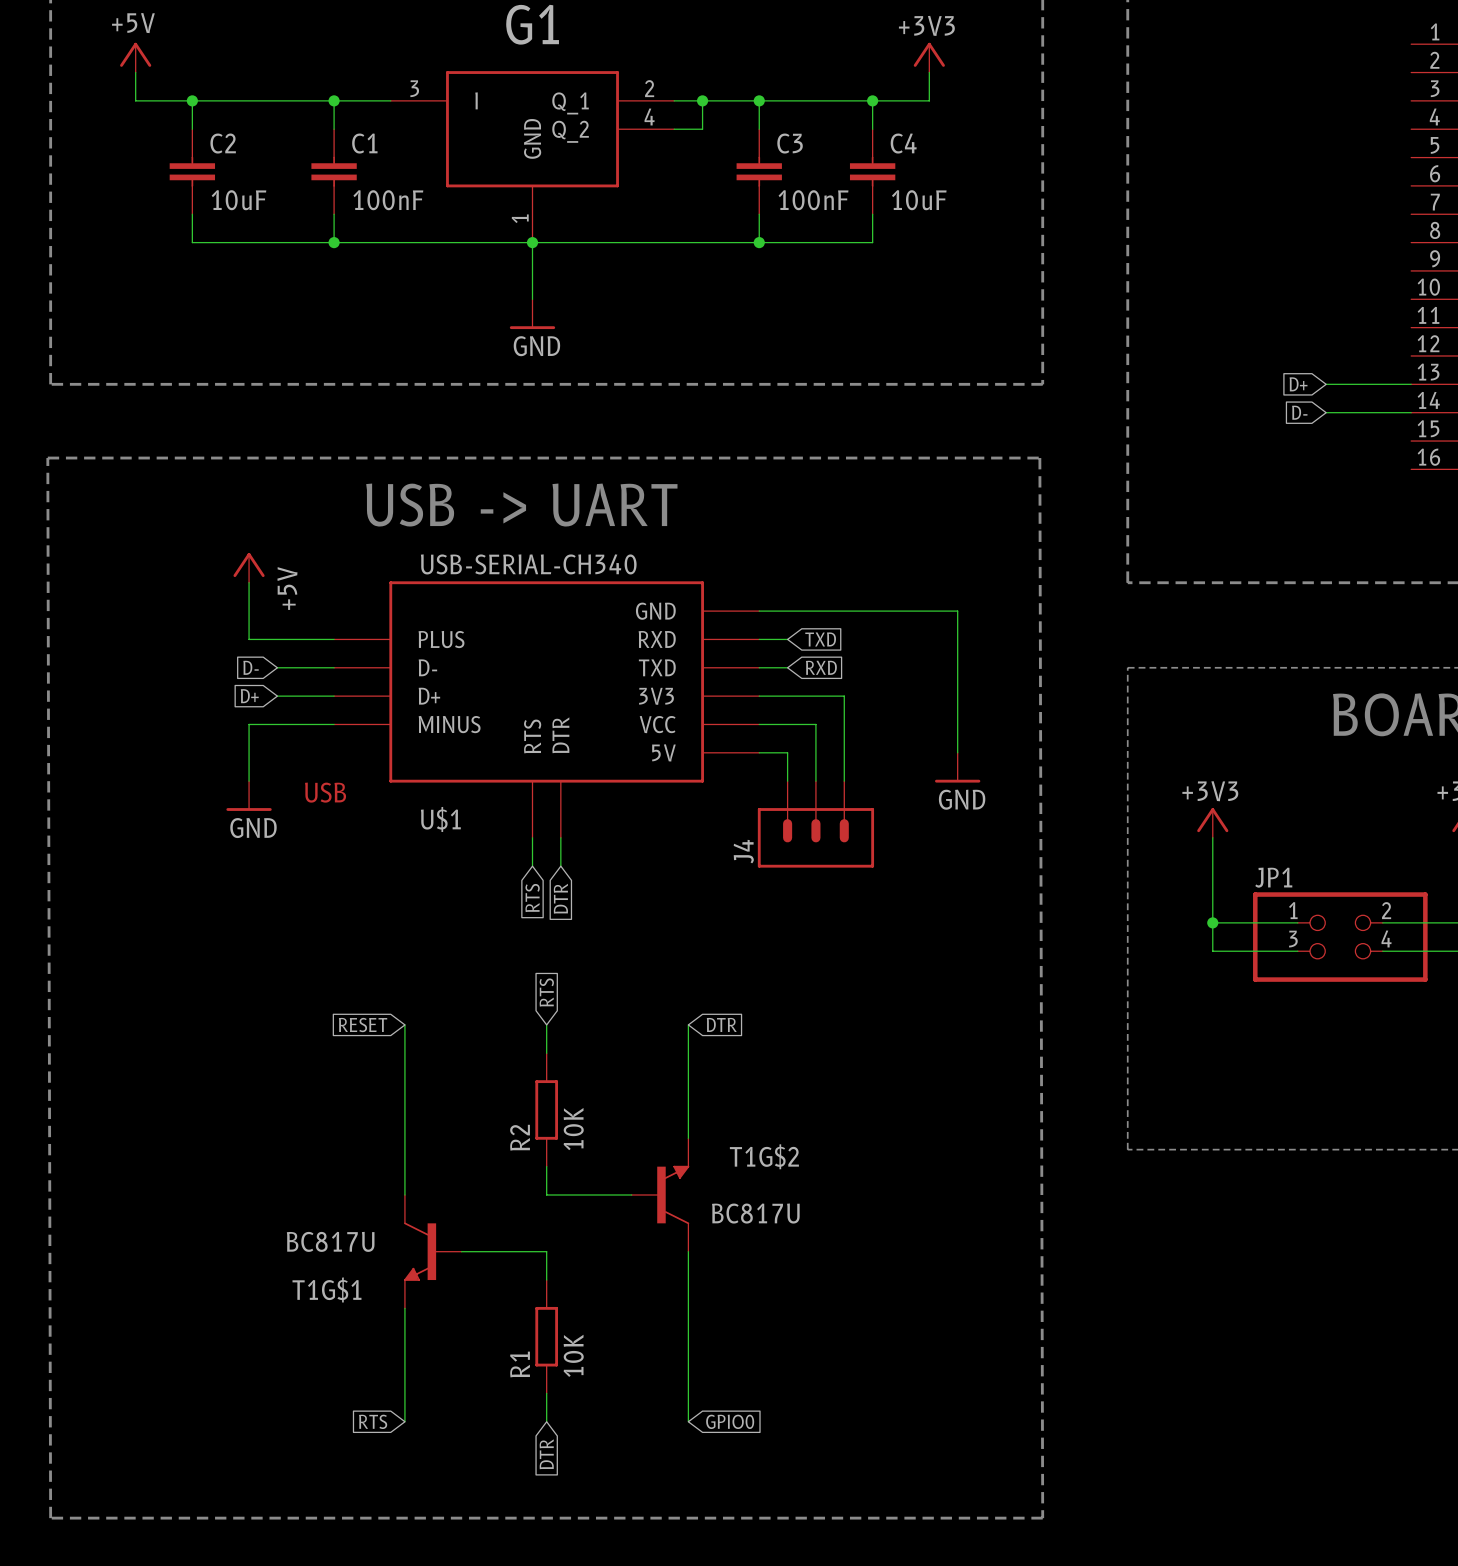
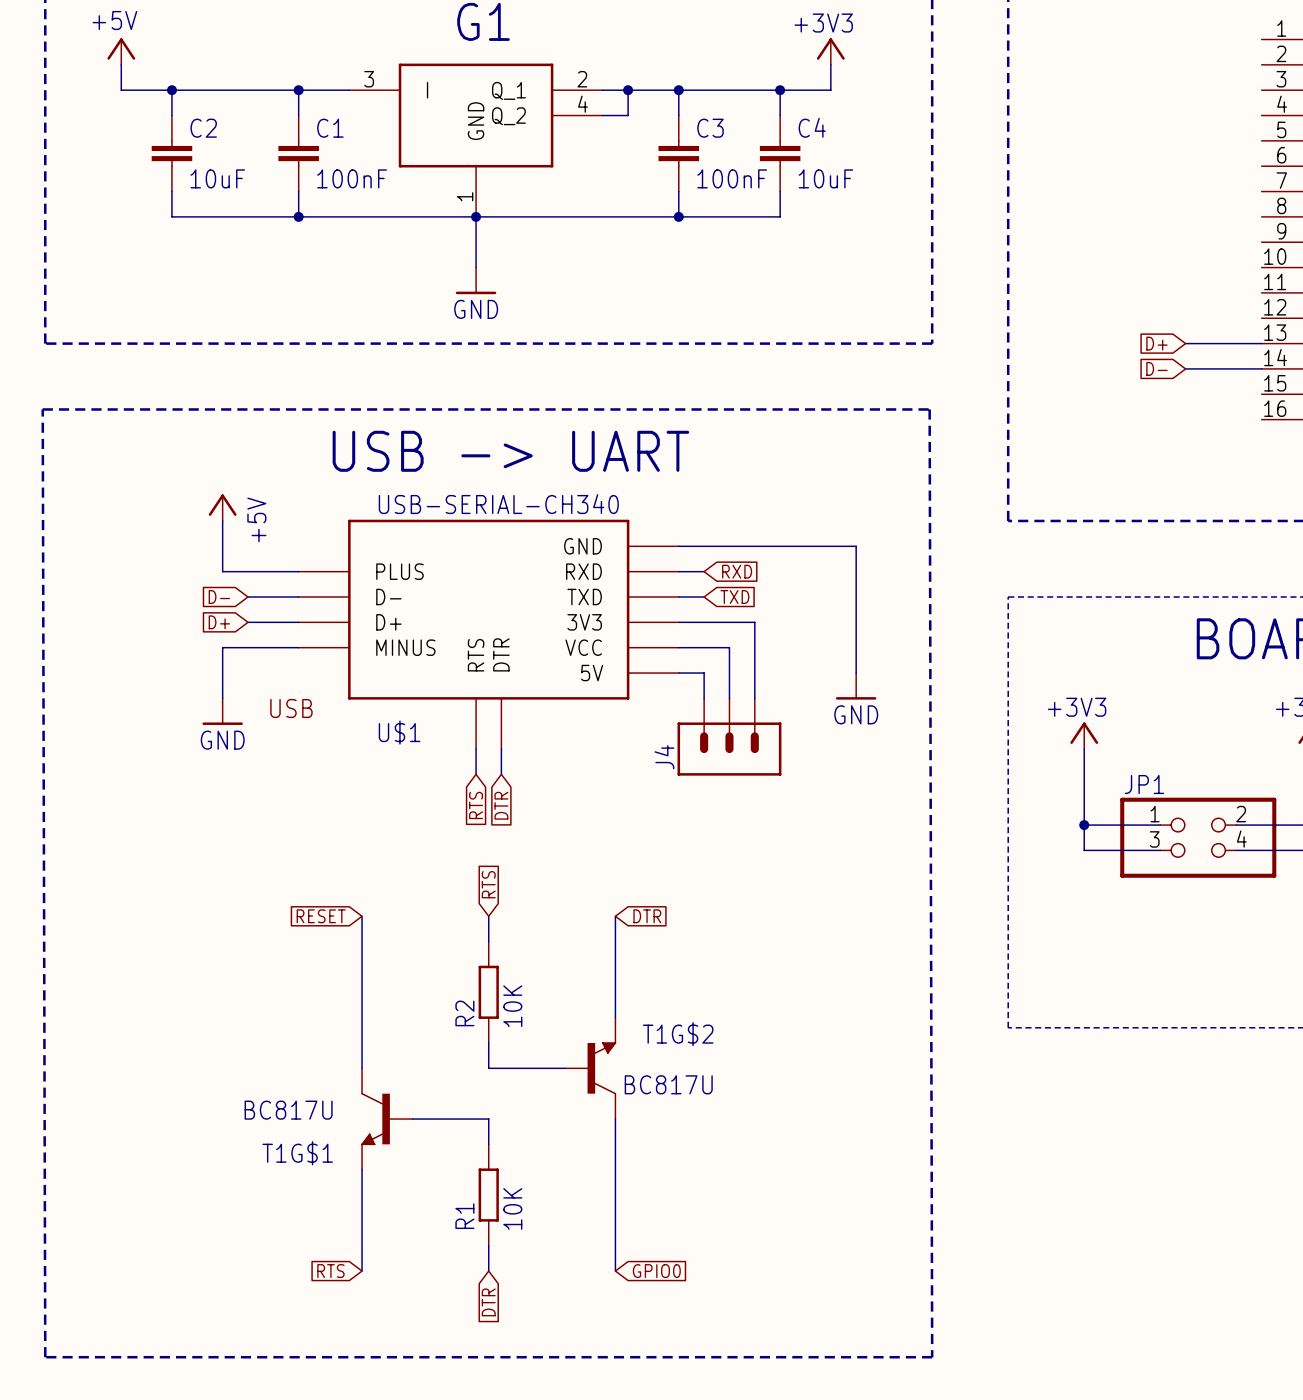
global label: TXD (820, 639) -> RXD (737, 571)
global label: RXD (821, 667) -> TXD (734, 597)

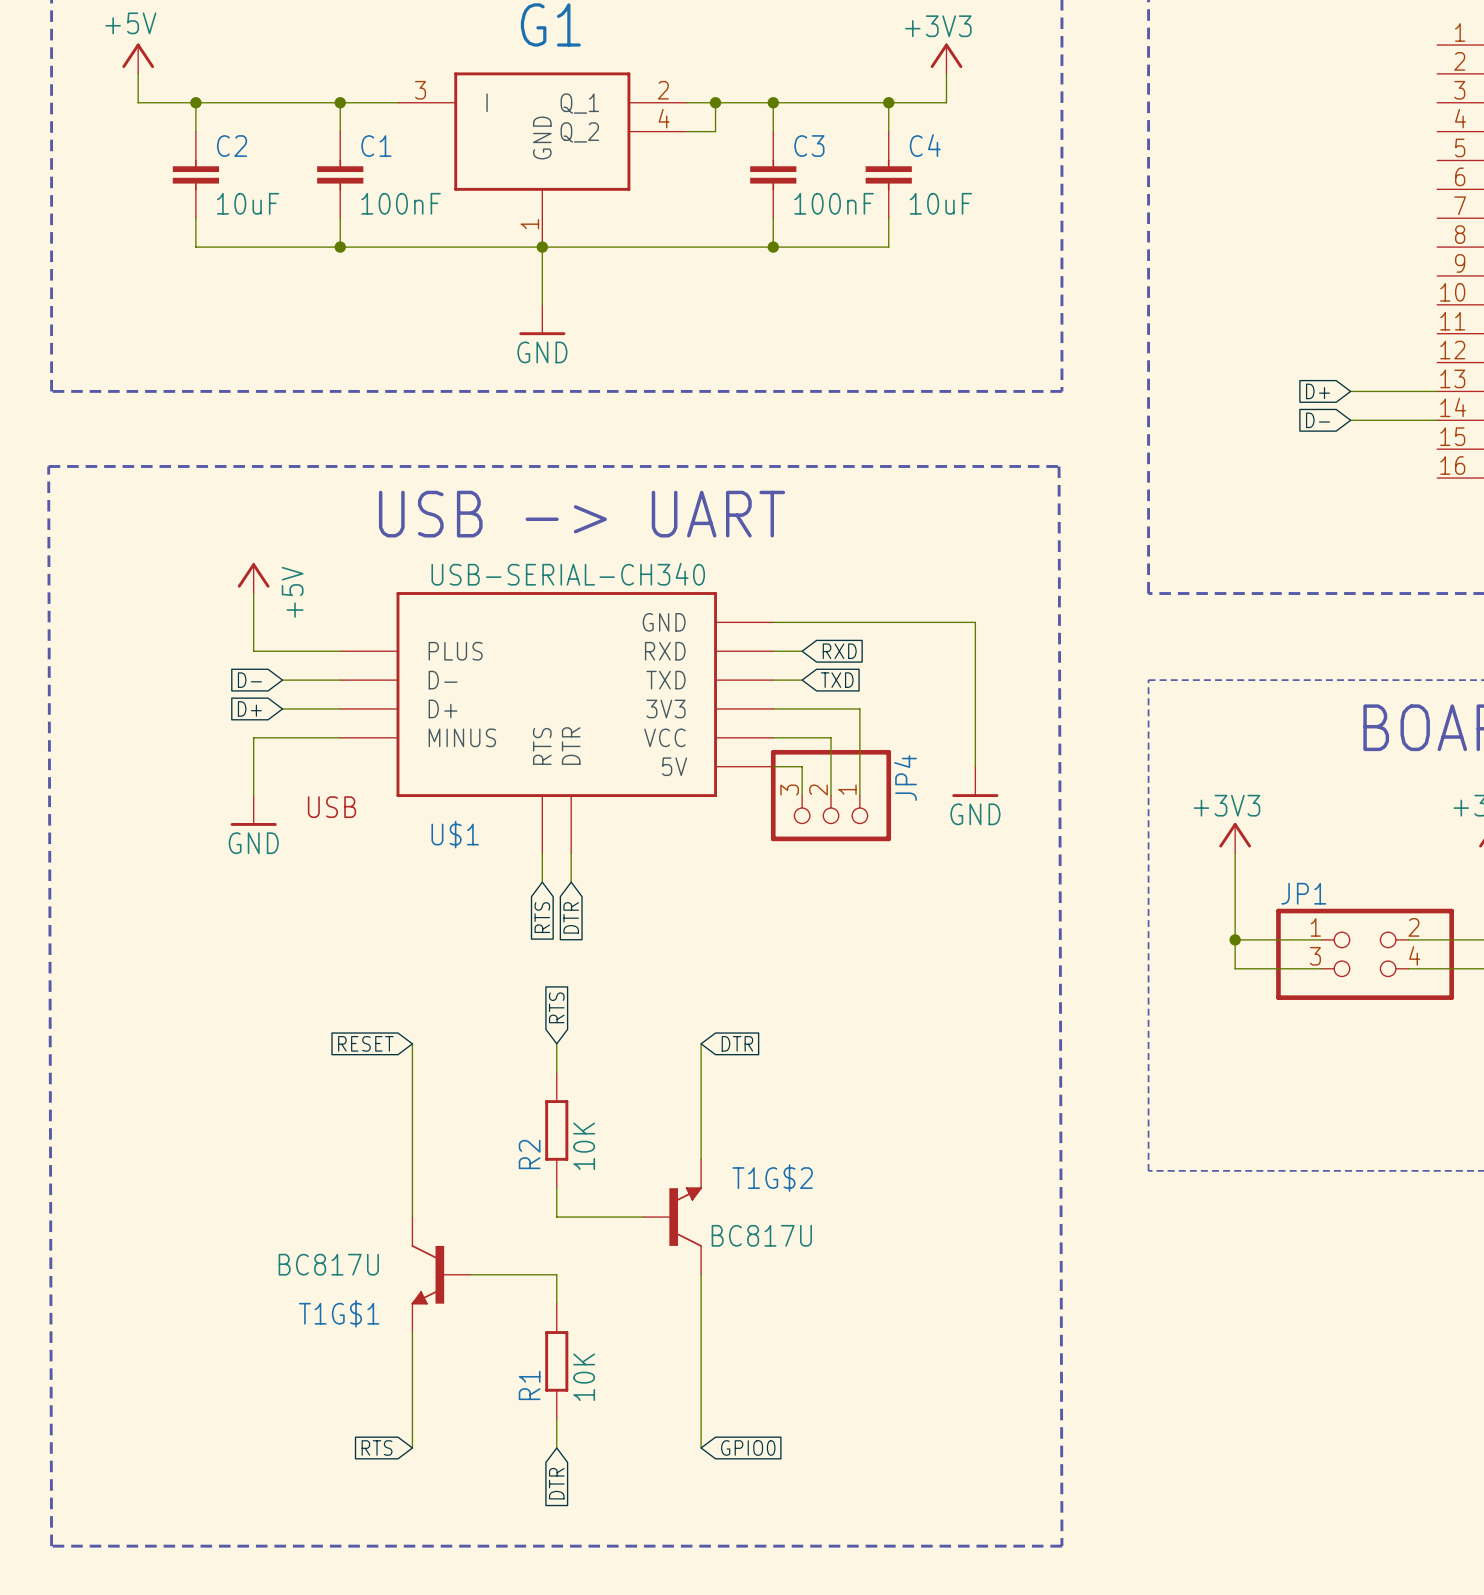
JP4: none -> (831, 795)
J4: (729, 737) -> none

